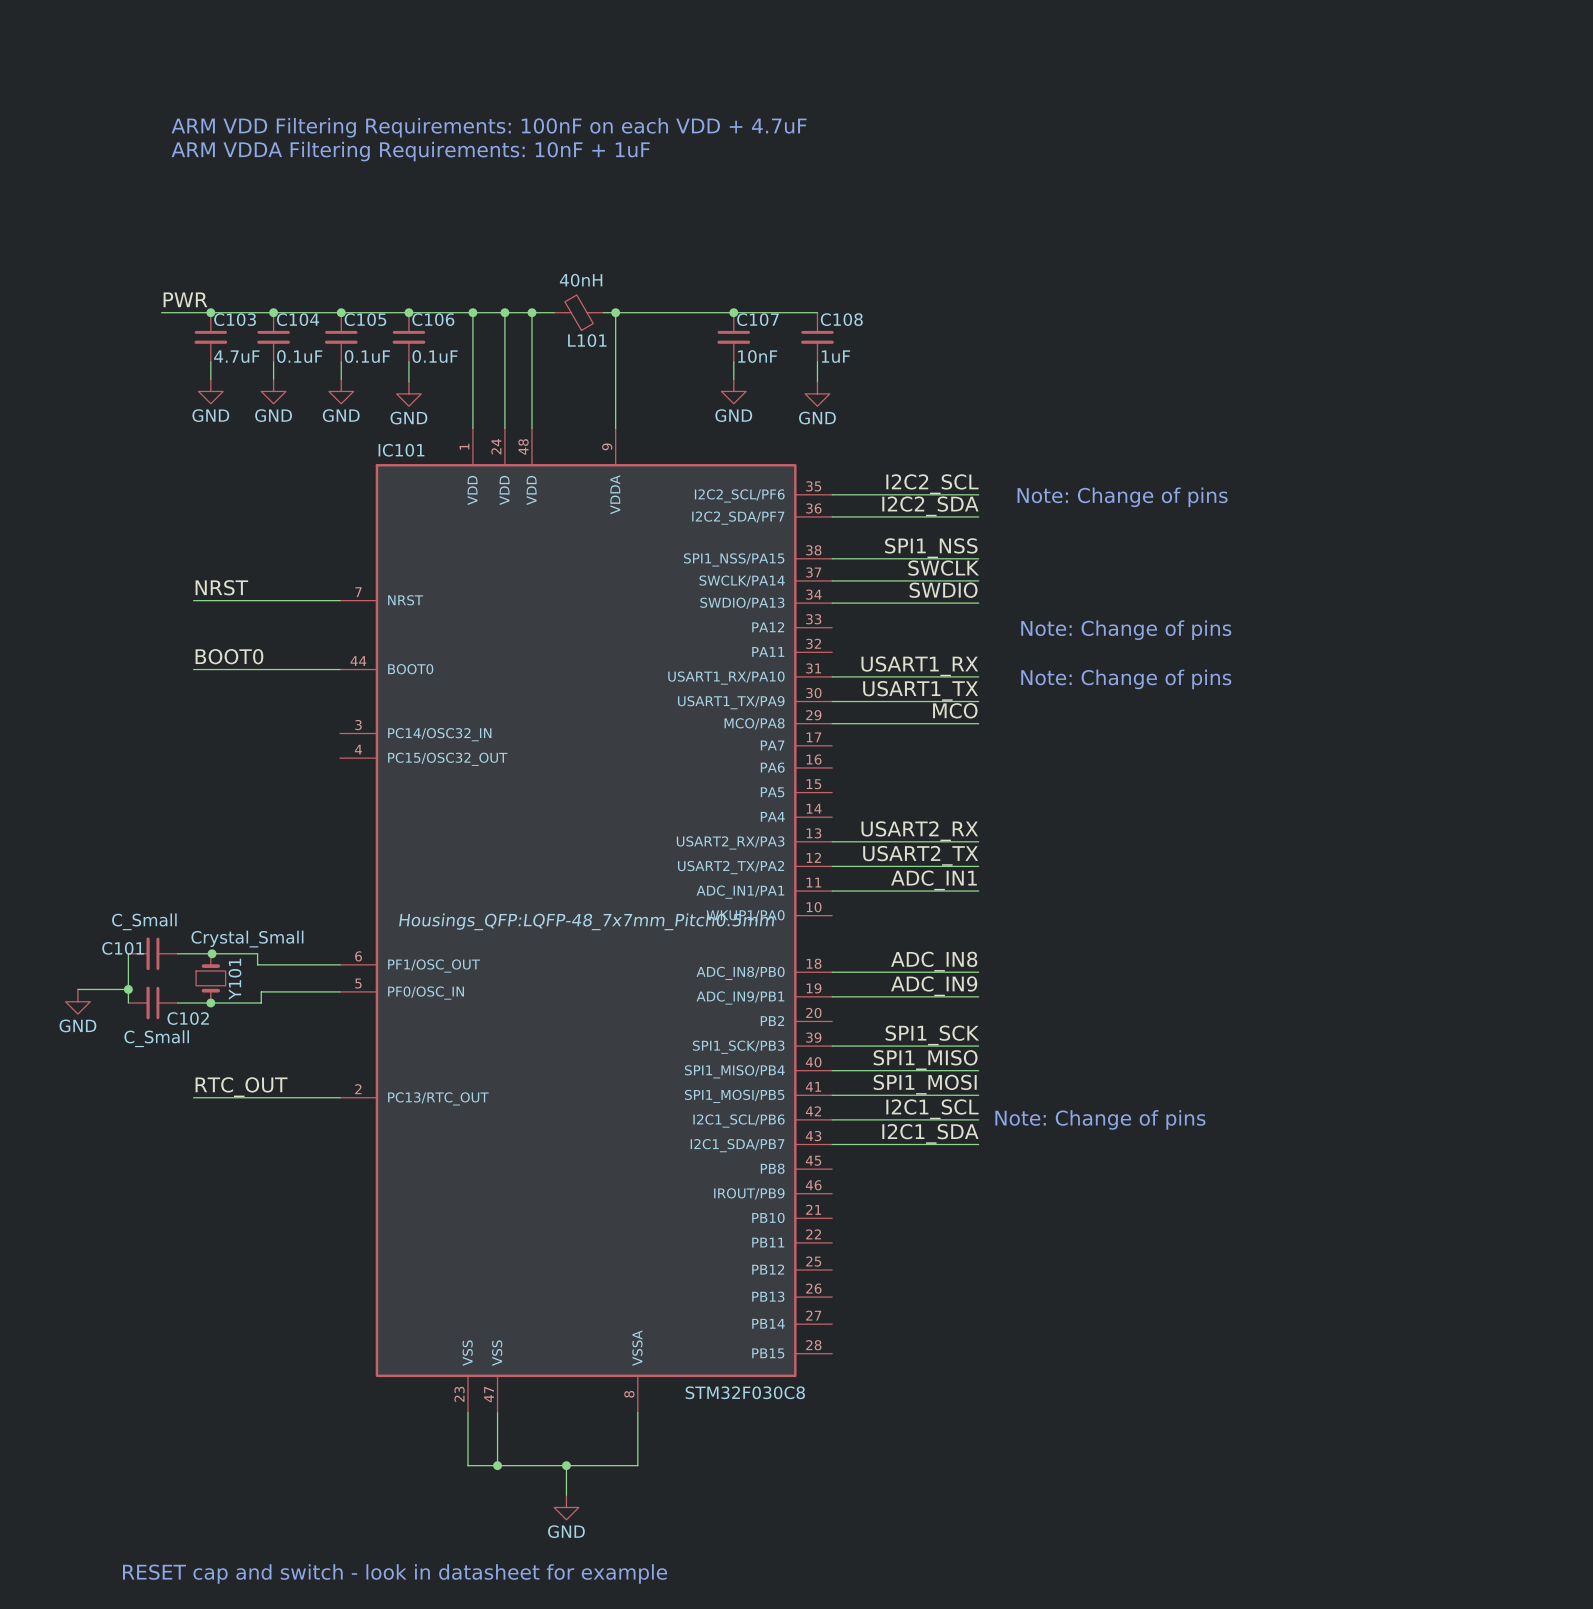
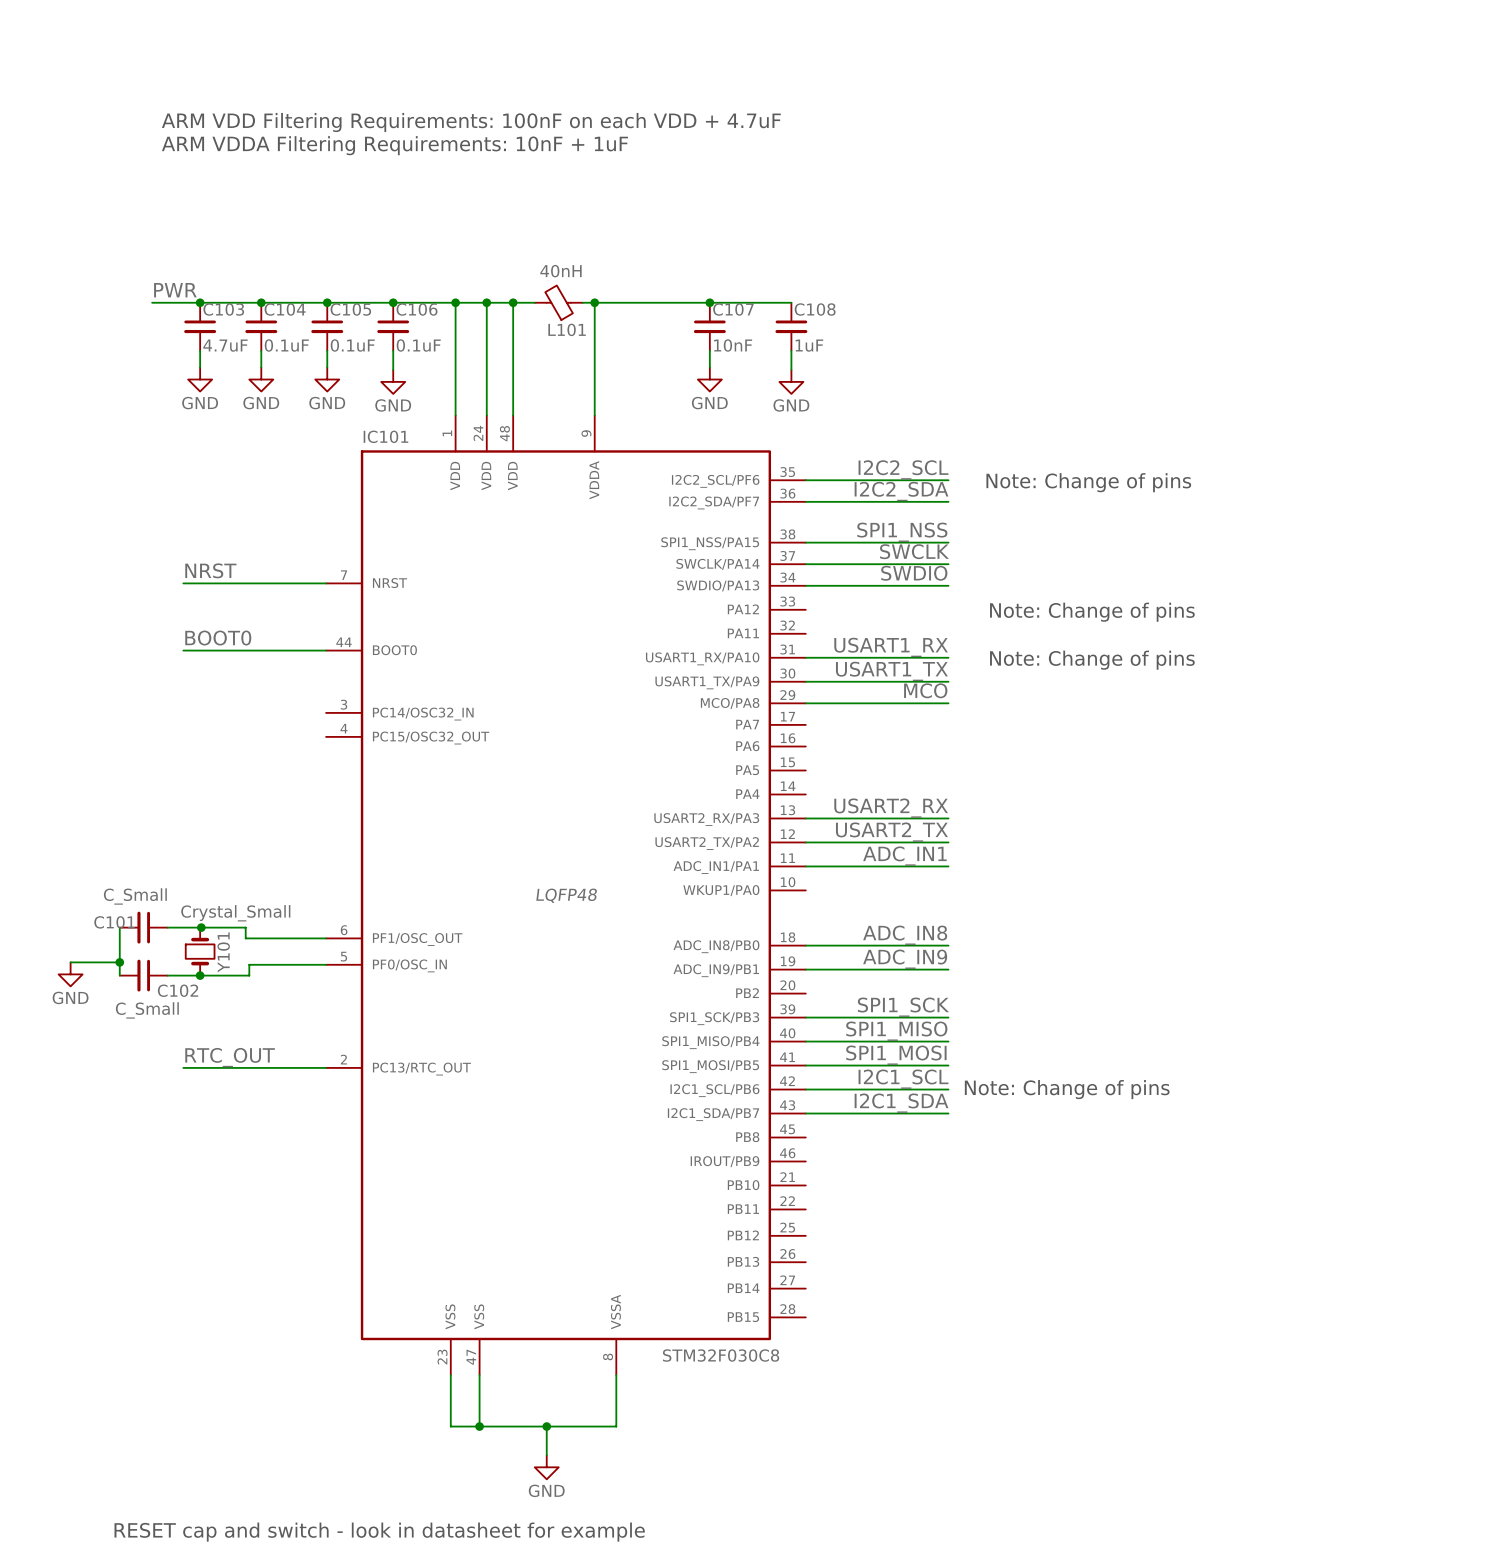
IC101 text: Housings_QFP:LQFP-48_7x7mm_Pitch0.5mm (586, 921) -> LQFP48 (566, 895)

